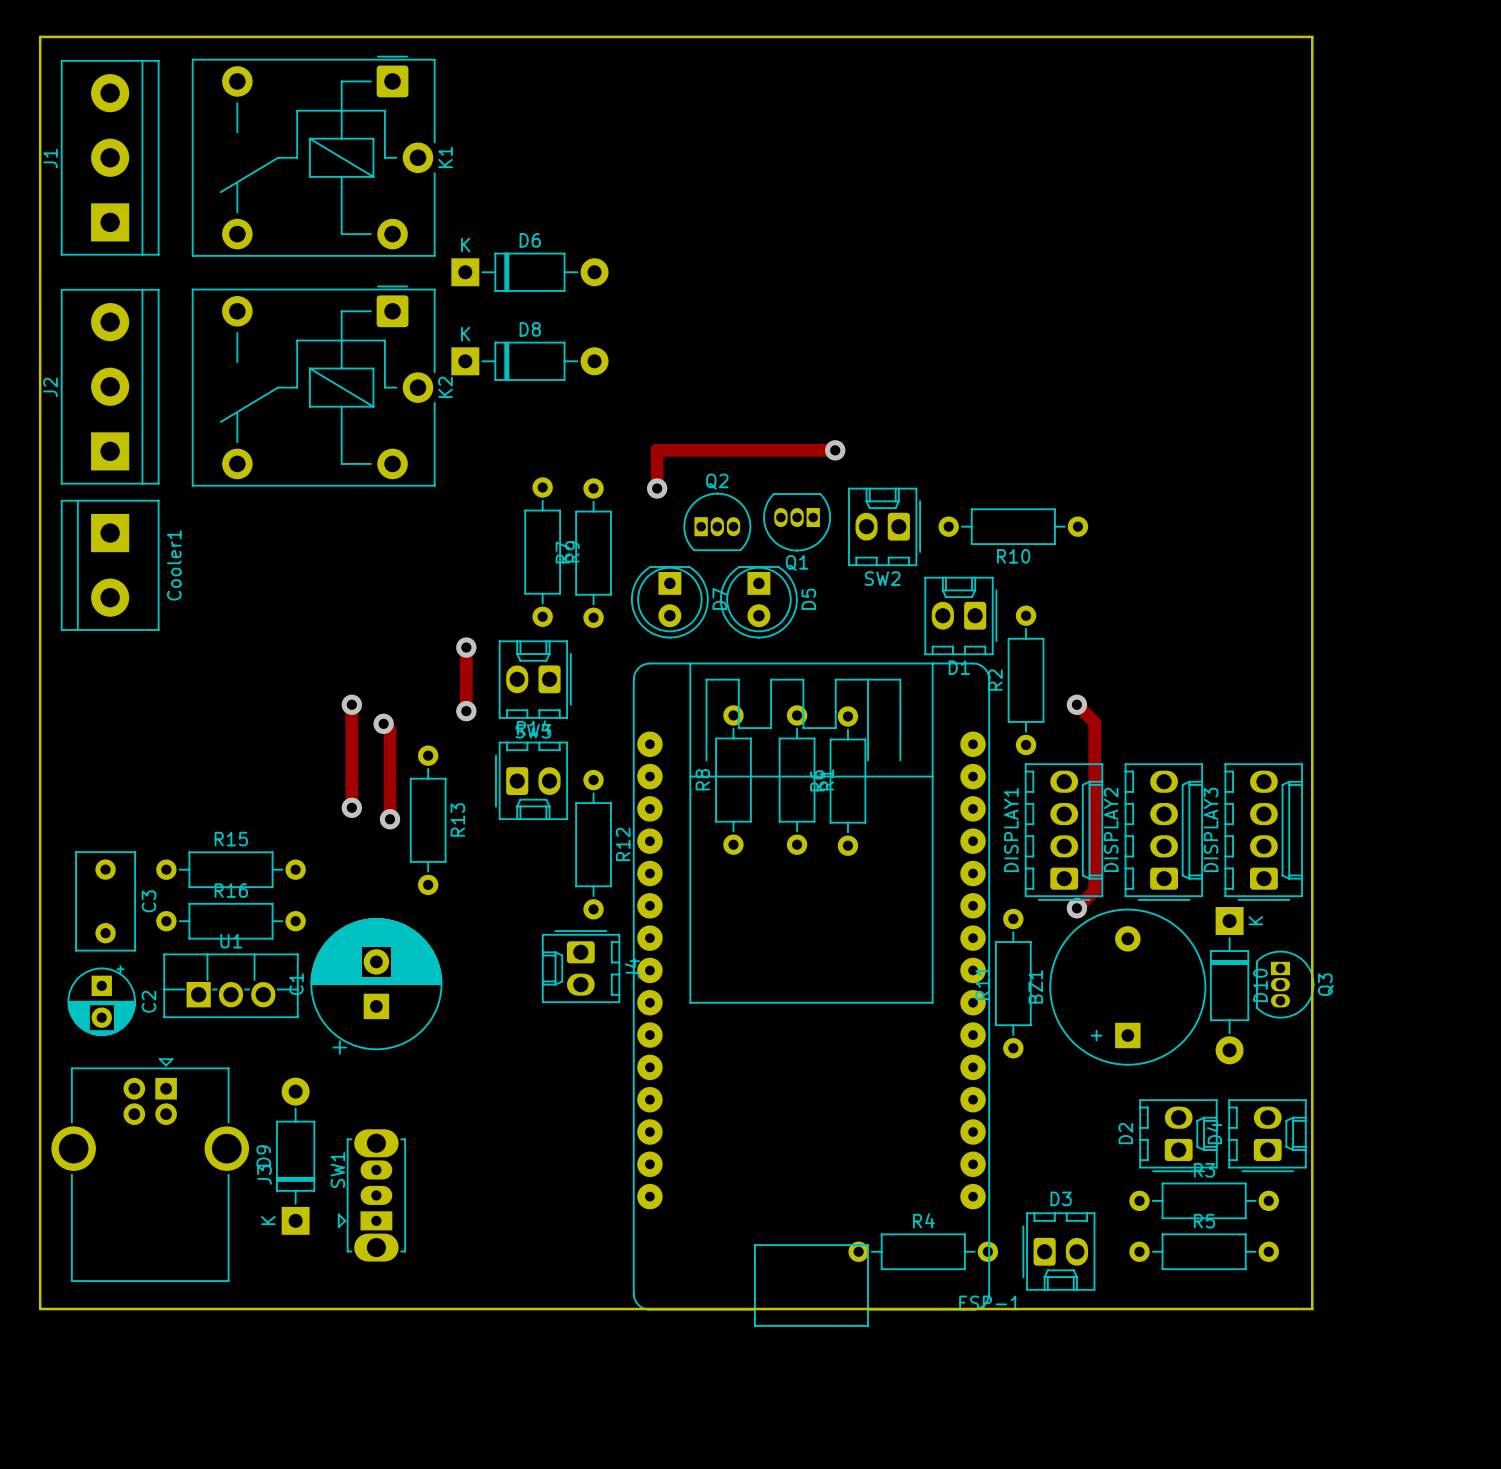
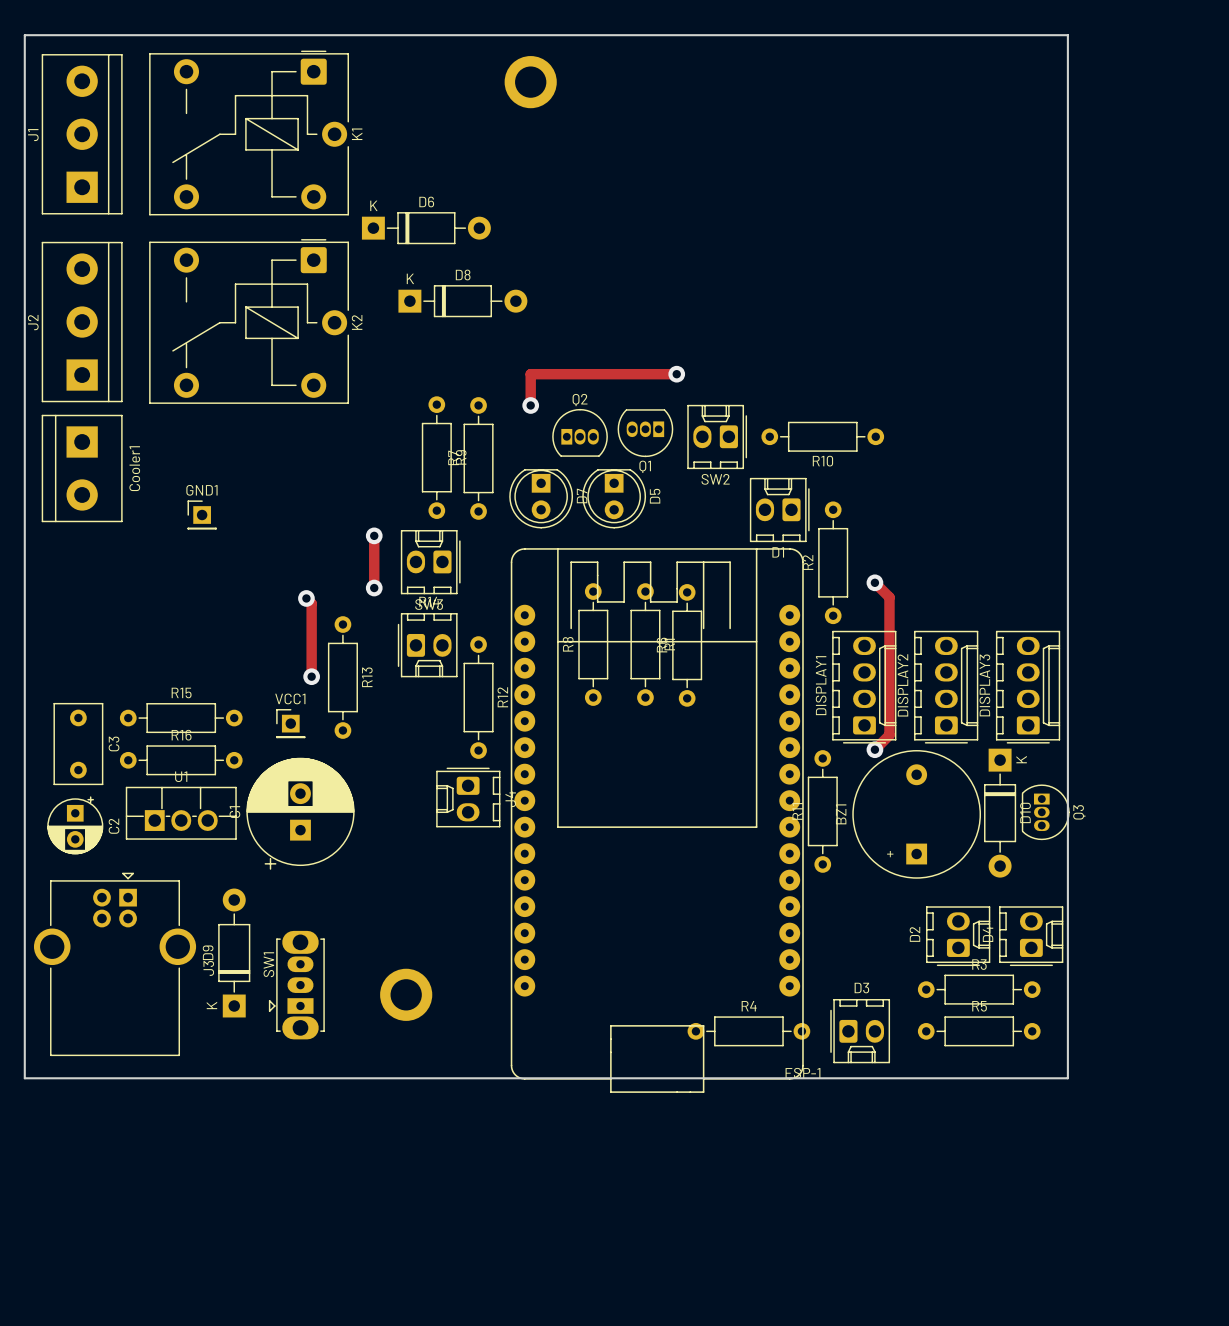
part: none -> (530, 82)
D8 position: (529, 361) -> (462, 301)
GND1: none -> (202, 515)
track: (351, 704) (351, 807) -> none
via: (351, 704) -> none
via: (351, 807) -> none
VCC1: none -> (290, 723)
part: none -> (406, 994)

